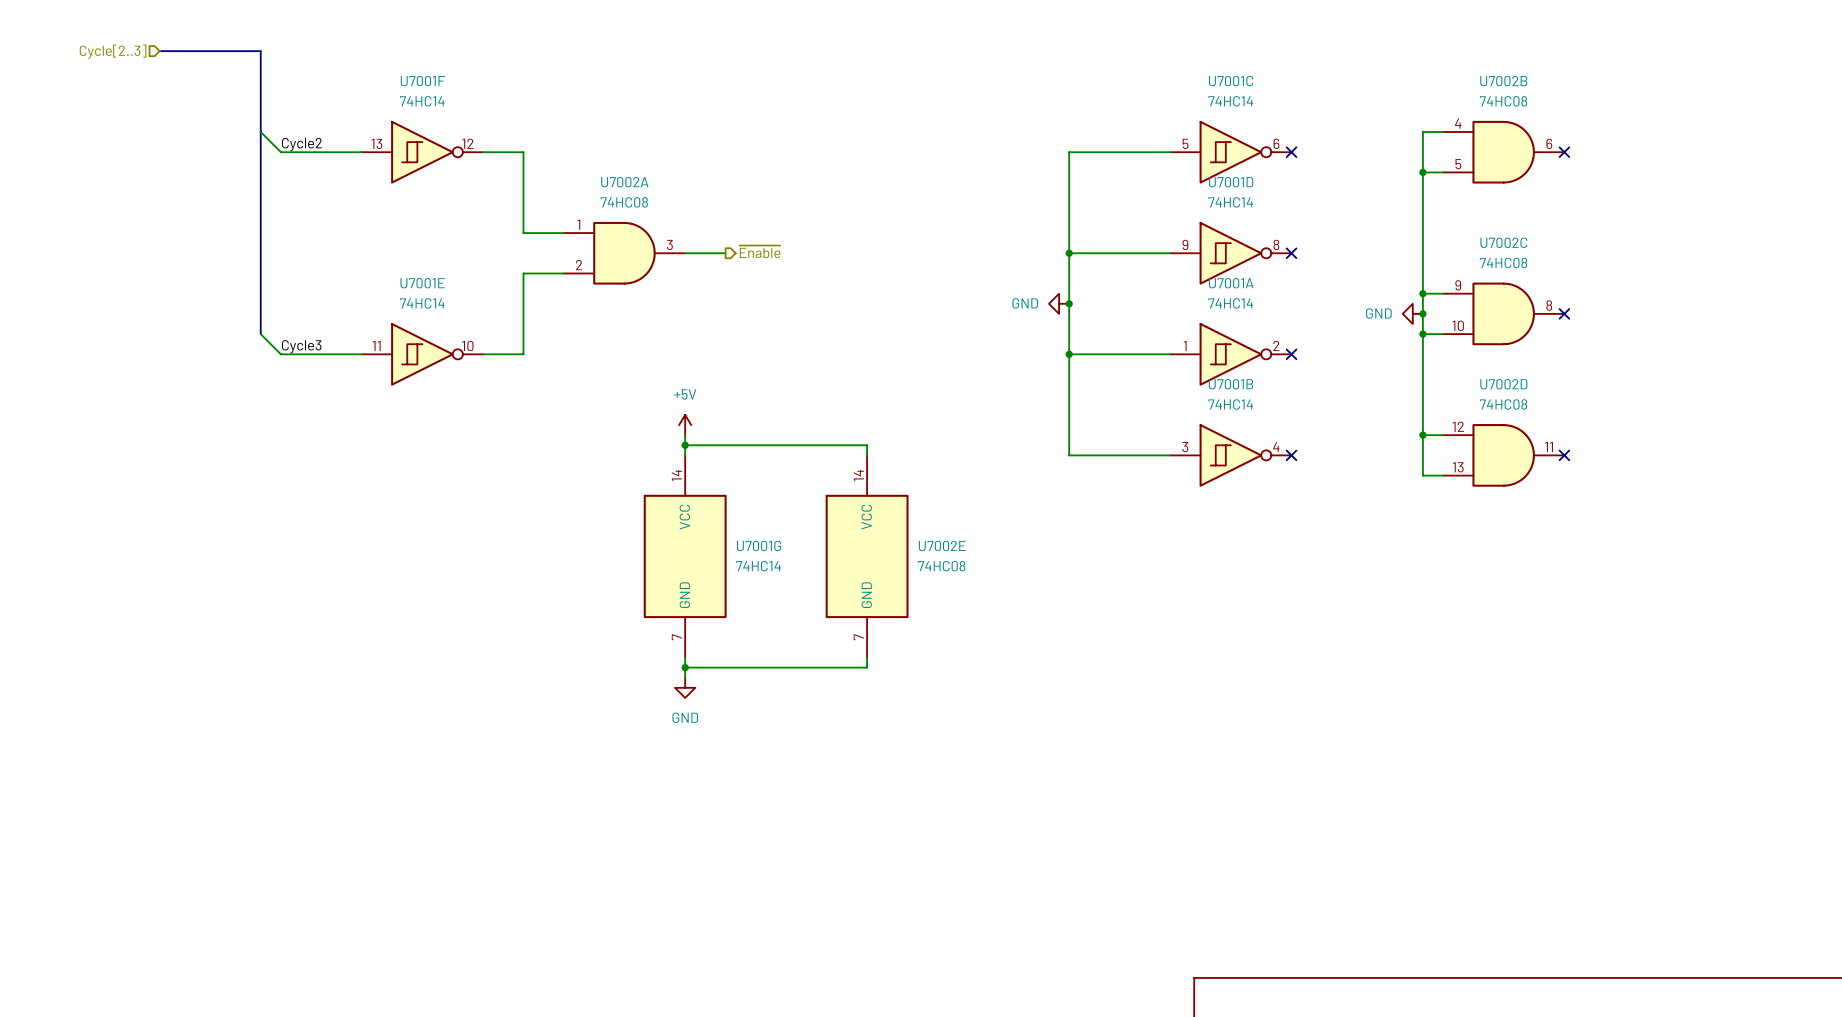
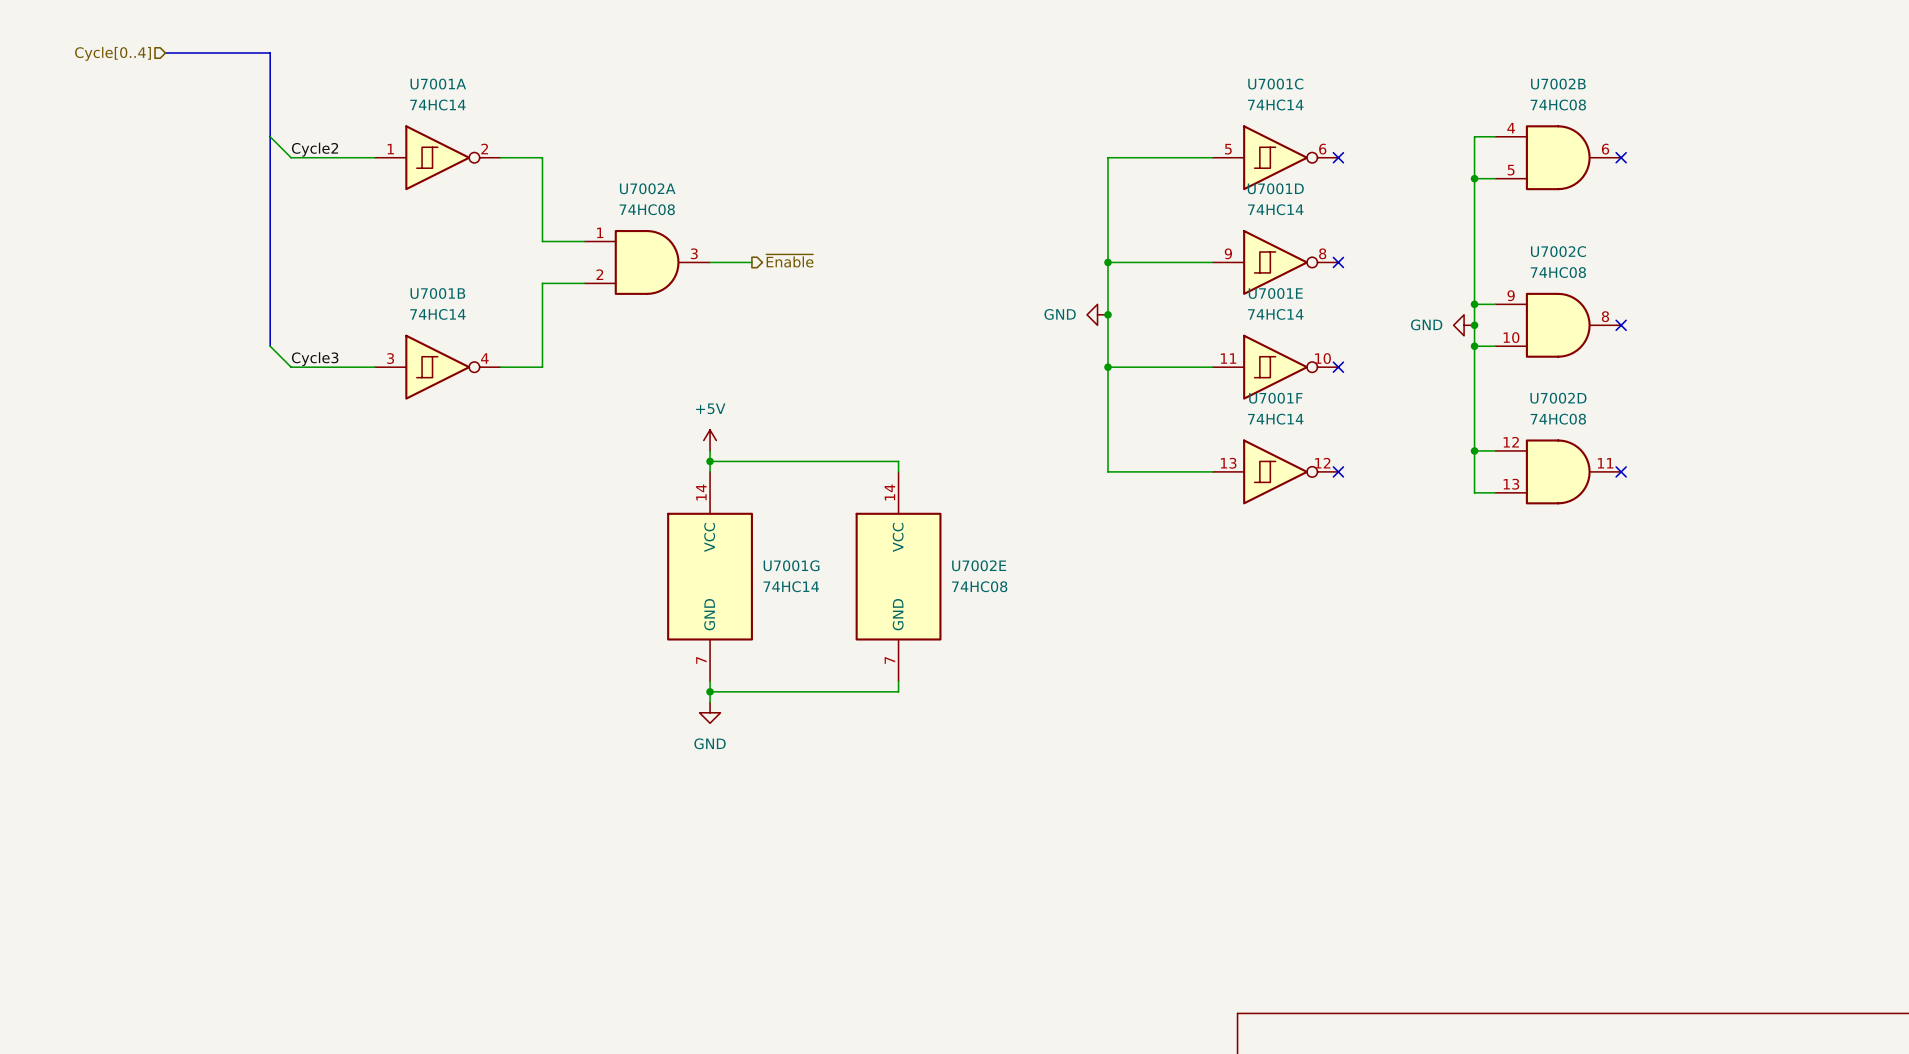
hierarchical label: Cycle[2..3] (113, 51) -> Cycle[0..4] (113, 53)
U7001F position: (422, 152) -> (1275, 471)
U7001E position: (422, 354) -> (1275, 367)
U7001A position: (1230, 354) -> (437, 157)
U7001B position: (1230, 455) -> (437, 367)

